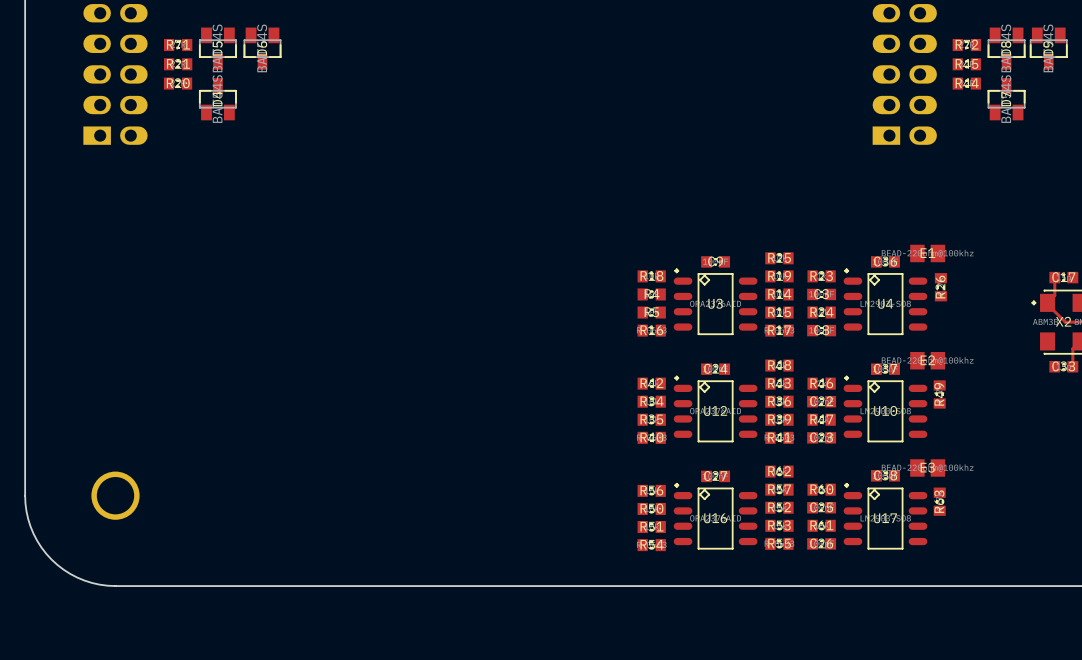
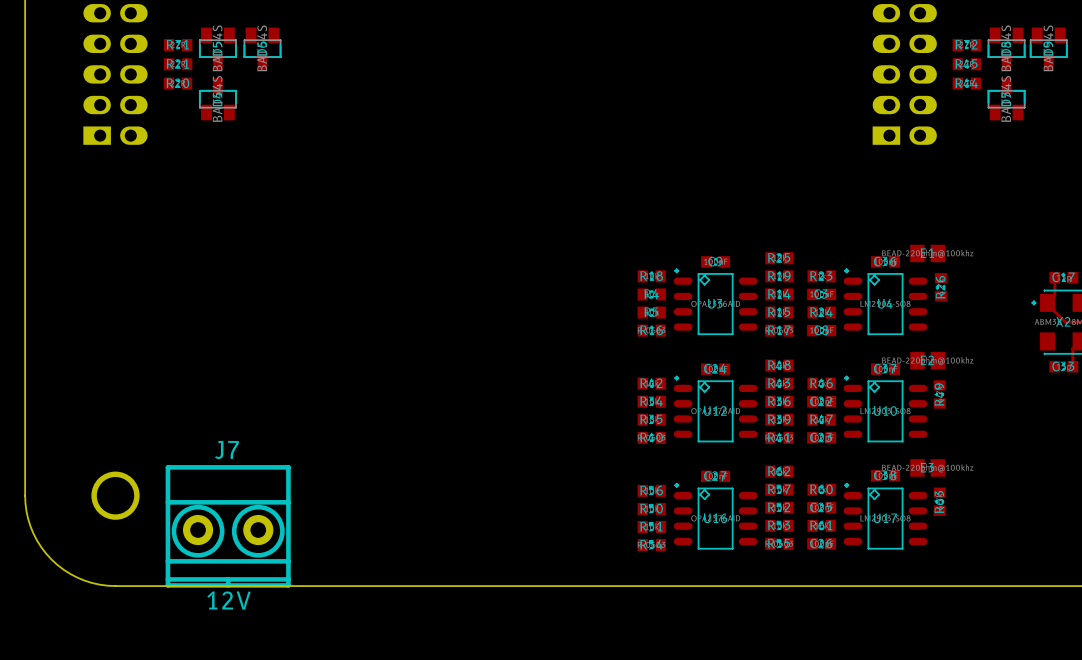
J7: none -> 12V (228, 526)

